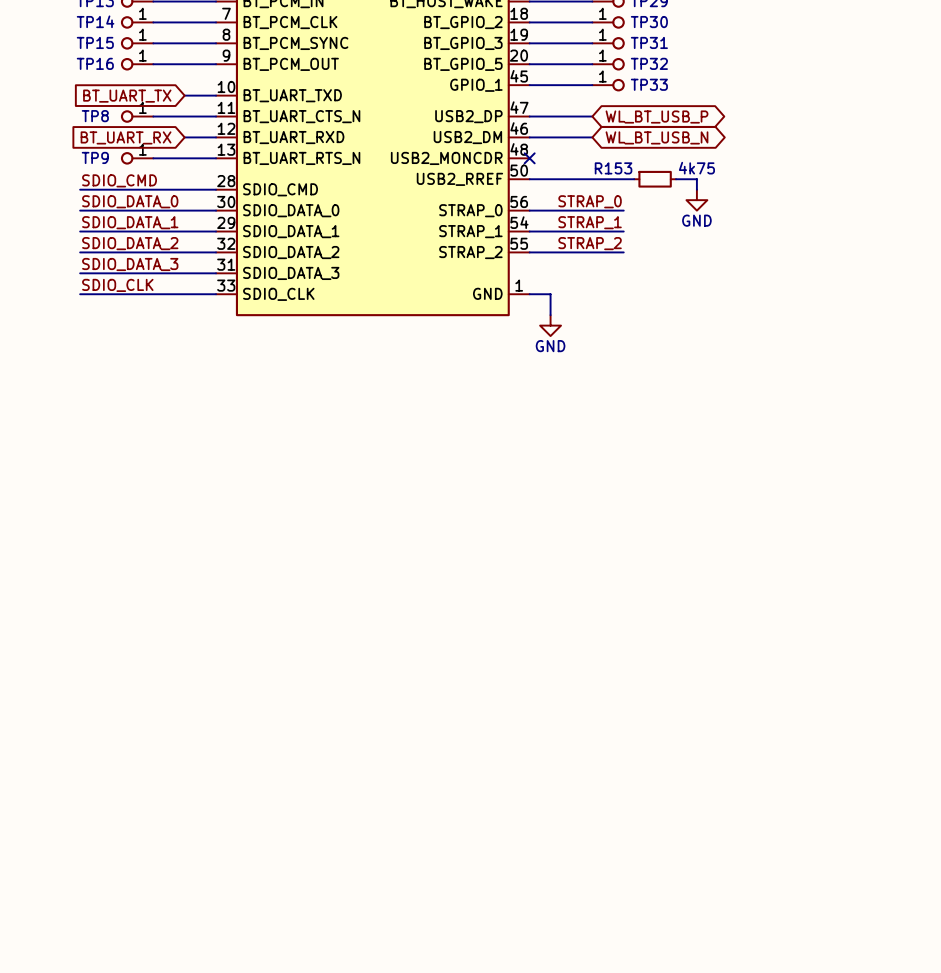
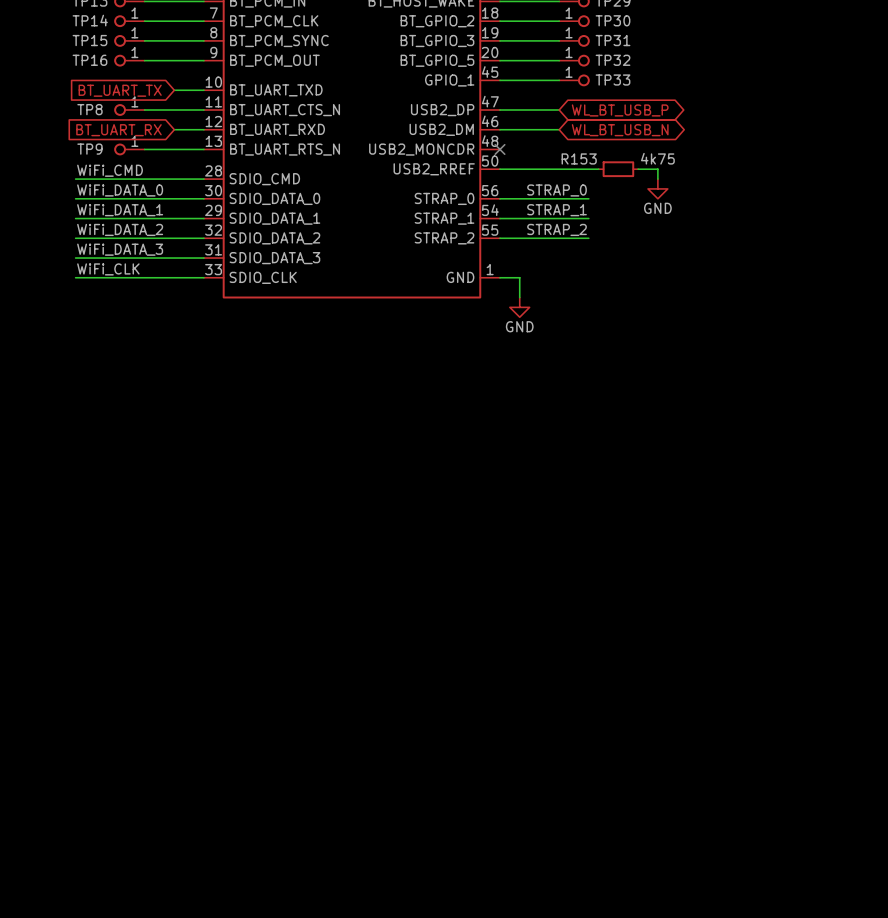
label: SDIO_CMD (119, 180) -> WiFi_CMD (110, 170)
label: SDIO_DATA_0 (130, 201) -> WiFi_DATA_0 (120, 190)
label: SDIO_DATA_1 (130, 222) -> WiFi_DATA_1 (120, 210)
label: SDIO_DATA_2 (130, 243) -> WiFi_DATA_2 (120, 229)
label: SDIO_DATA_3 (130, 264) -> WiFi_DATA_3 (120, 249)
label: SDIO_CLK (117, 285) -> WiFi_CLK (108, 269)

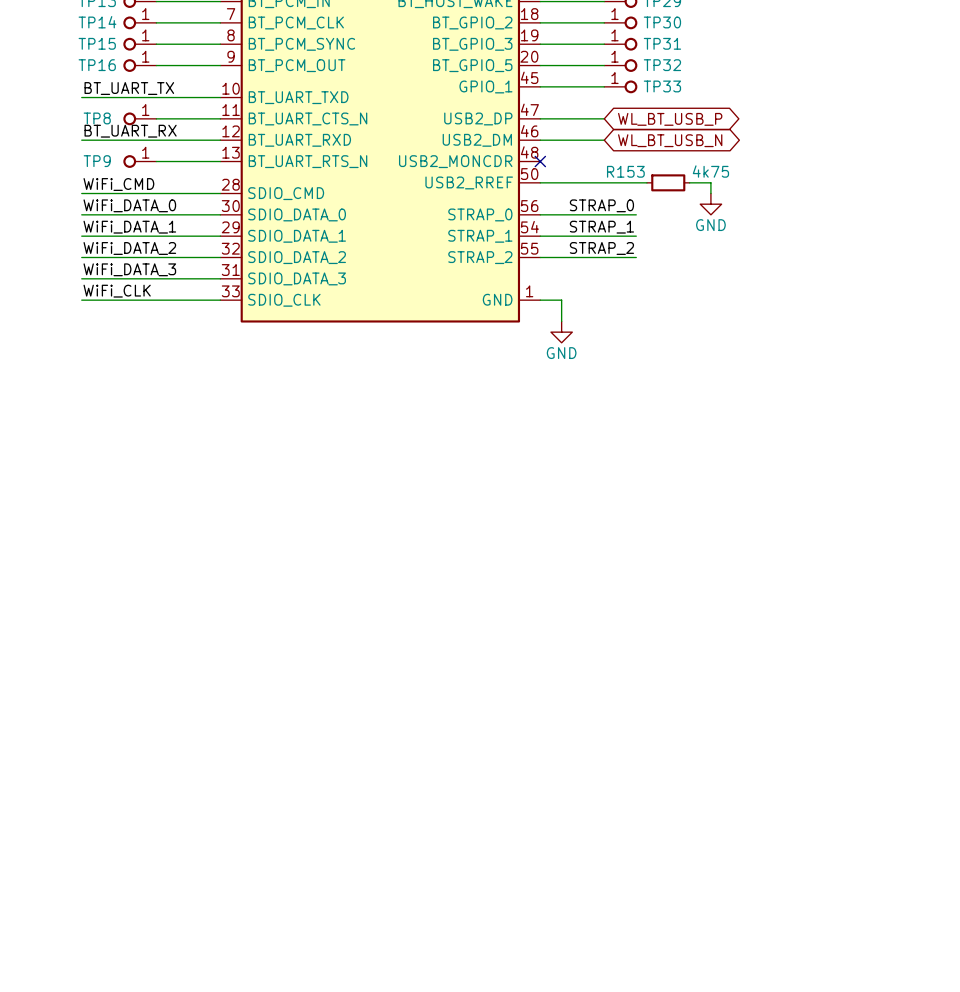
label: none -> BT_UART_TX (129, 88)
wire: none -> (81, 97) (188, 97)
global label: BT_UART_TX (120, 90) -> none
label: none -> BT_UART_RX (130, 131)
wire: none -> (81, 140) (188, 140)
global label: BT_UART_RX (118, 130) -> none

